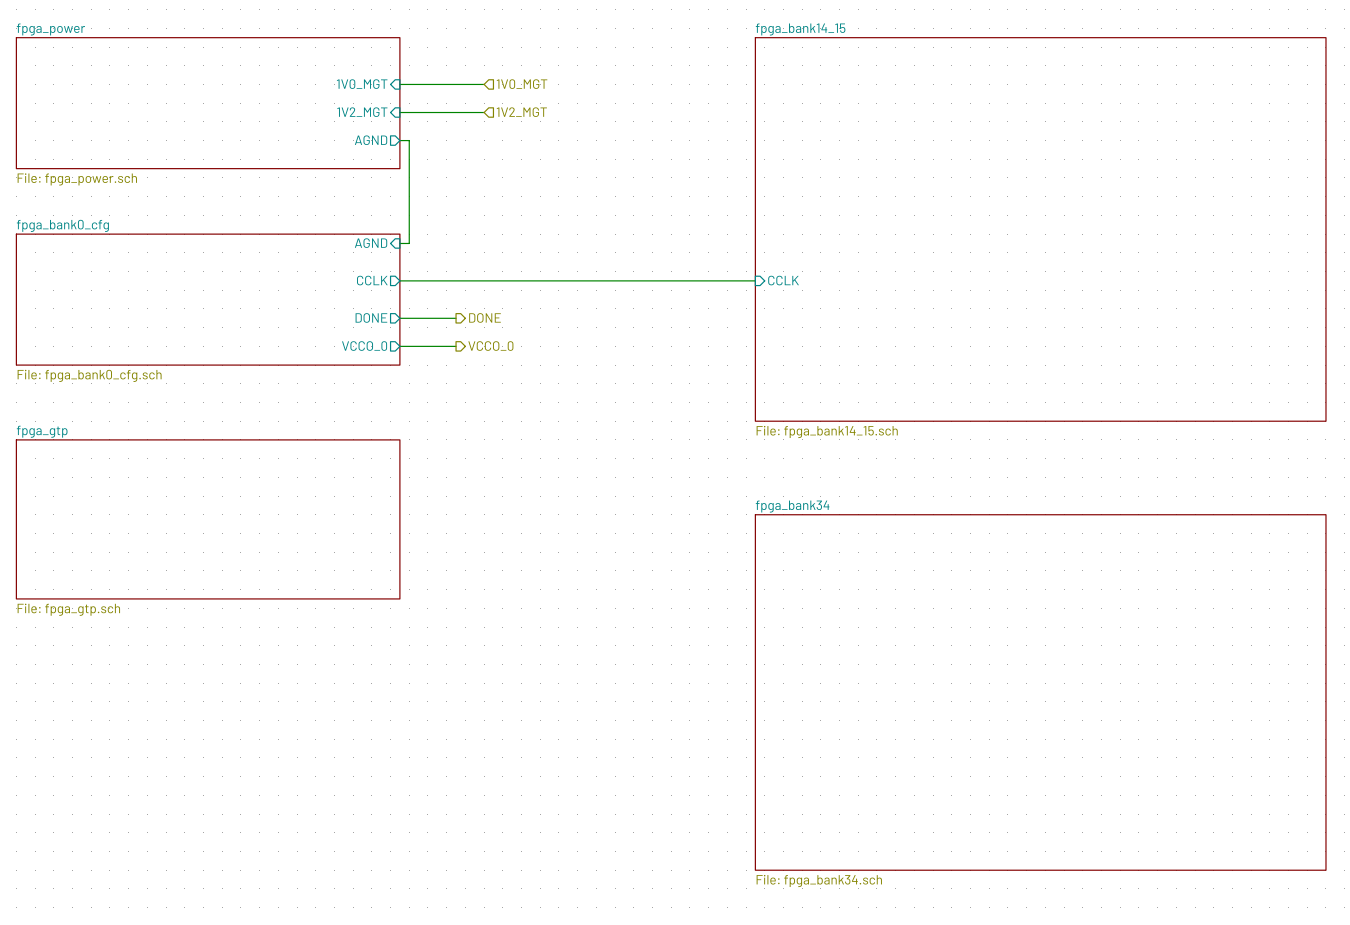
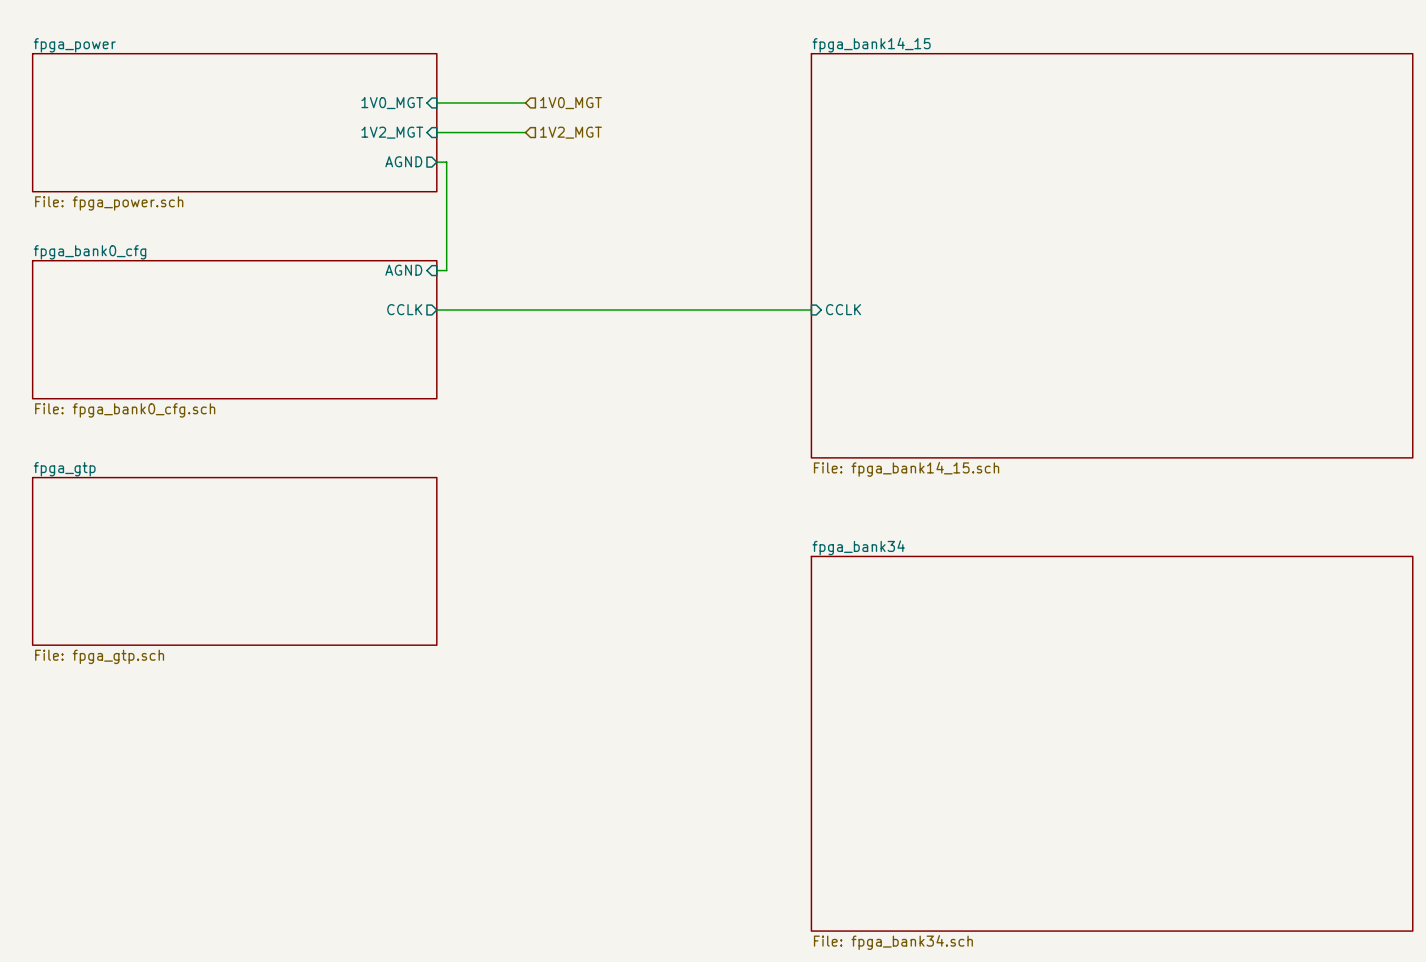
sheet pin: DONE (371, 317) -> none
hierarchical label: DONE (485, 317) -> none
wire: (399, 318) (456, 318) -> none
sheet pin: VCCO_0 (364, 346) -> none
wire: (399, 346) (456, 346) -> none
hierarchical label: VCCO_0 (490, 346) -> none

